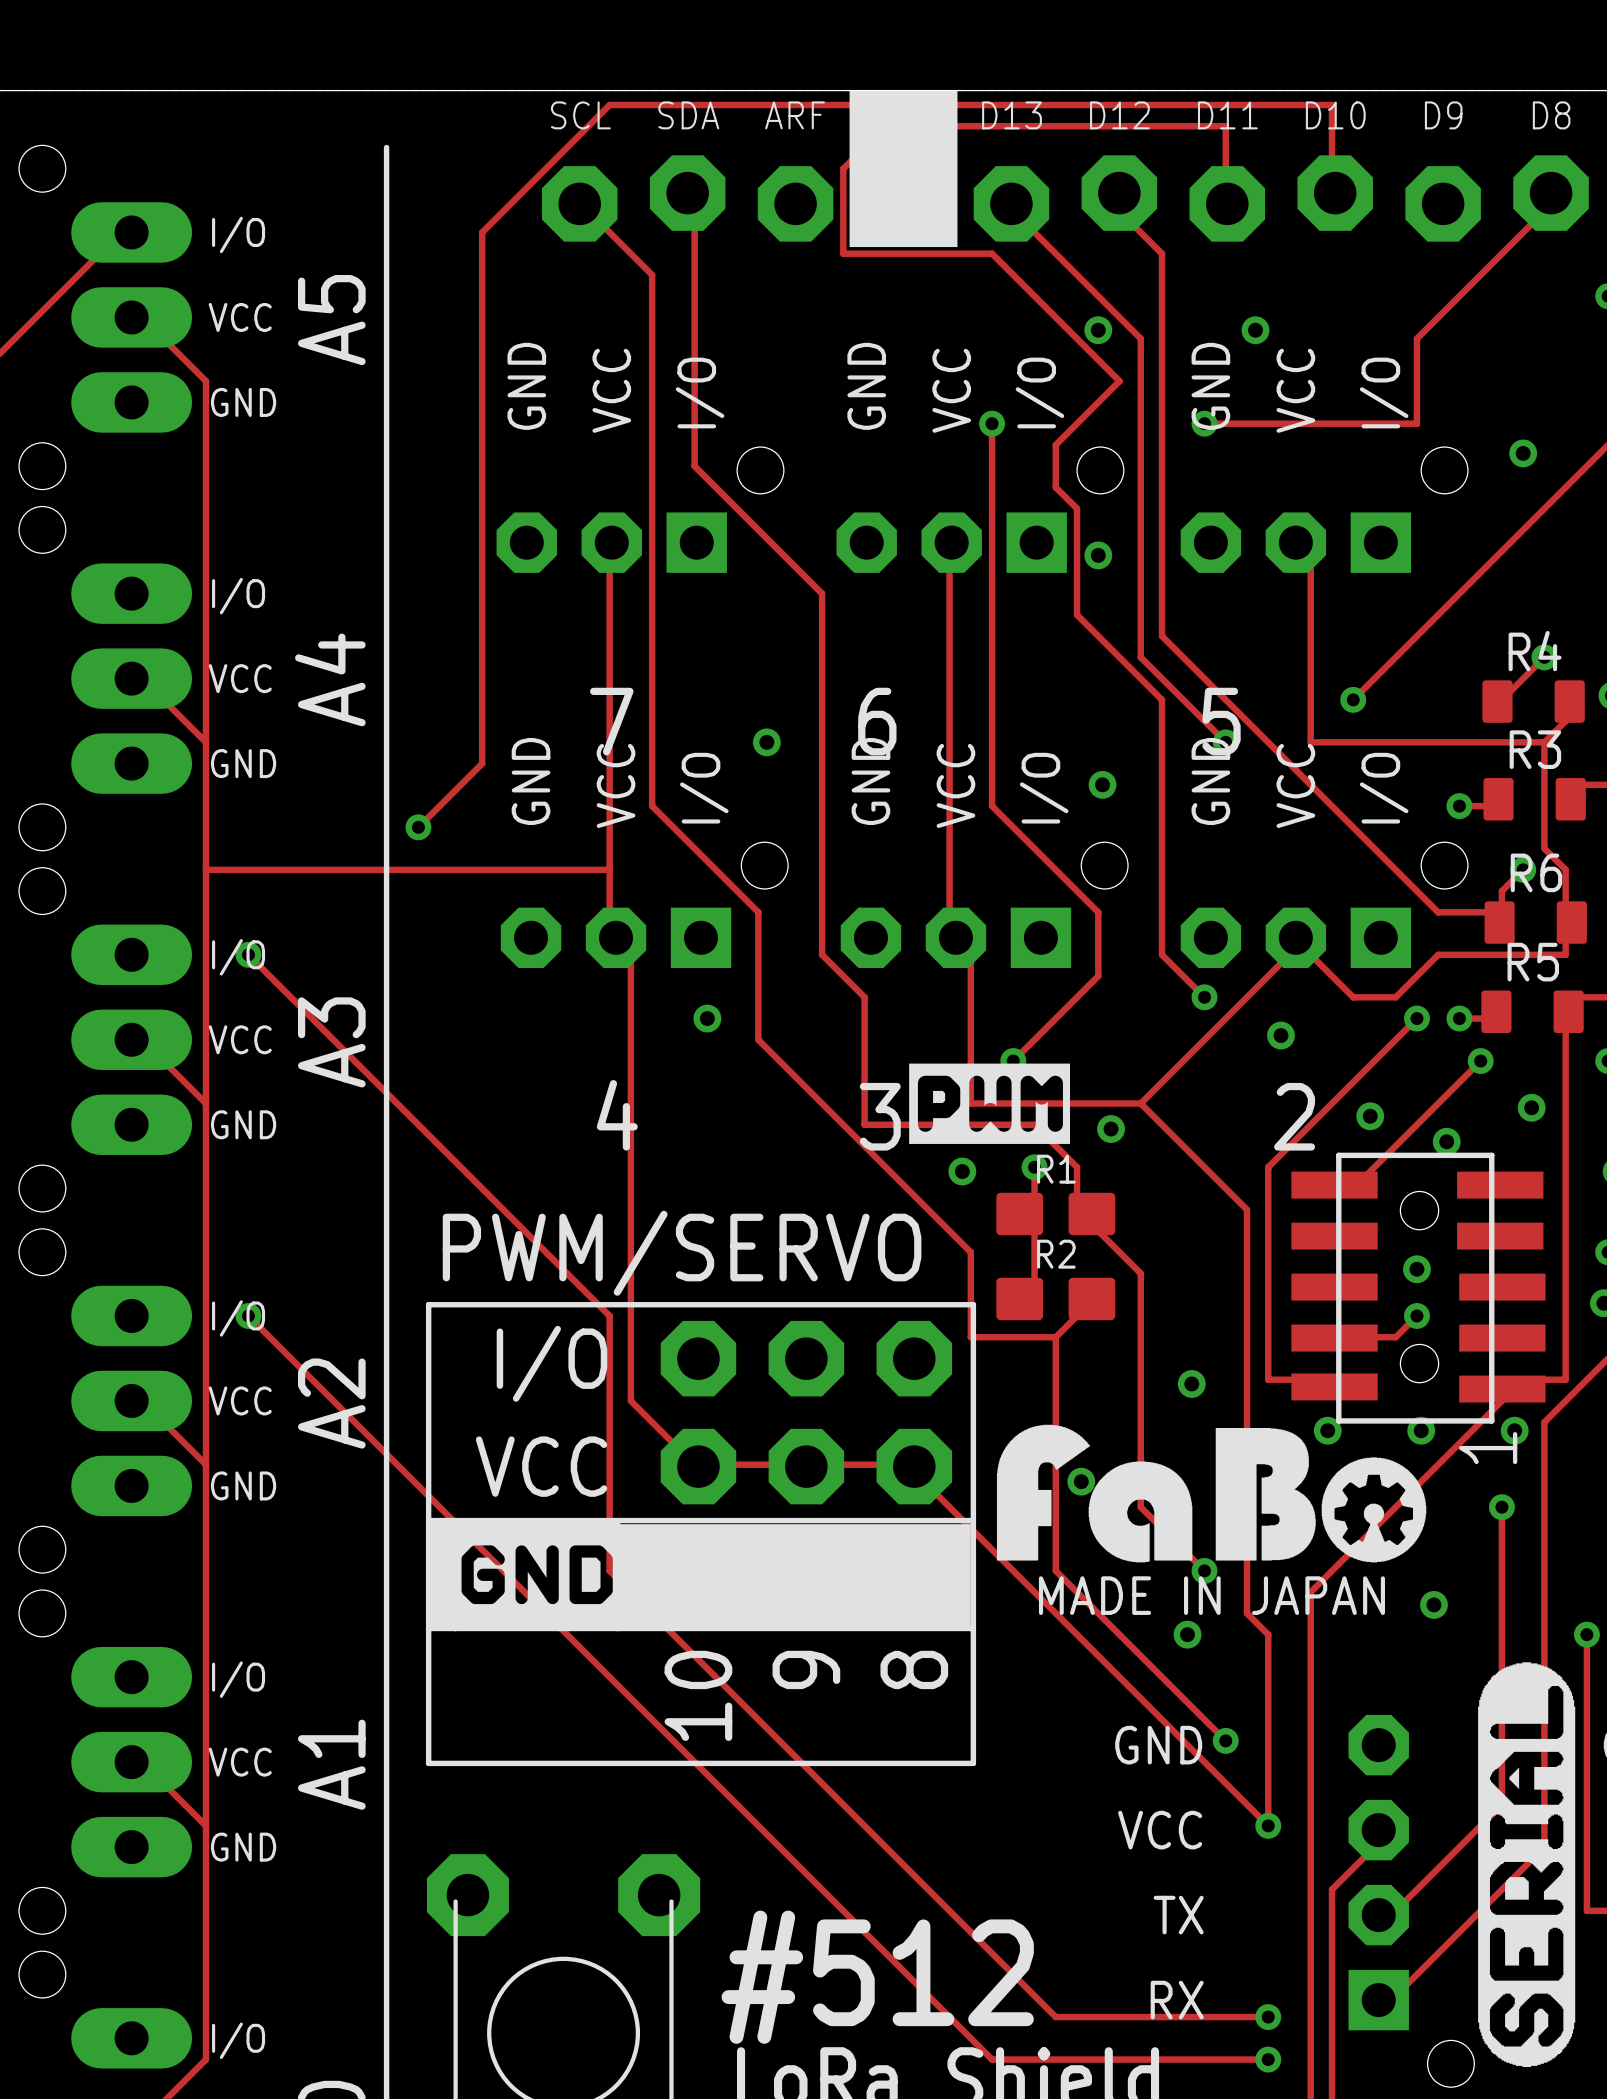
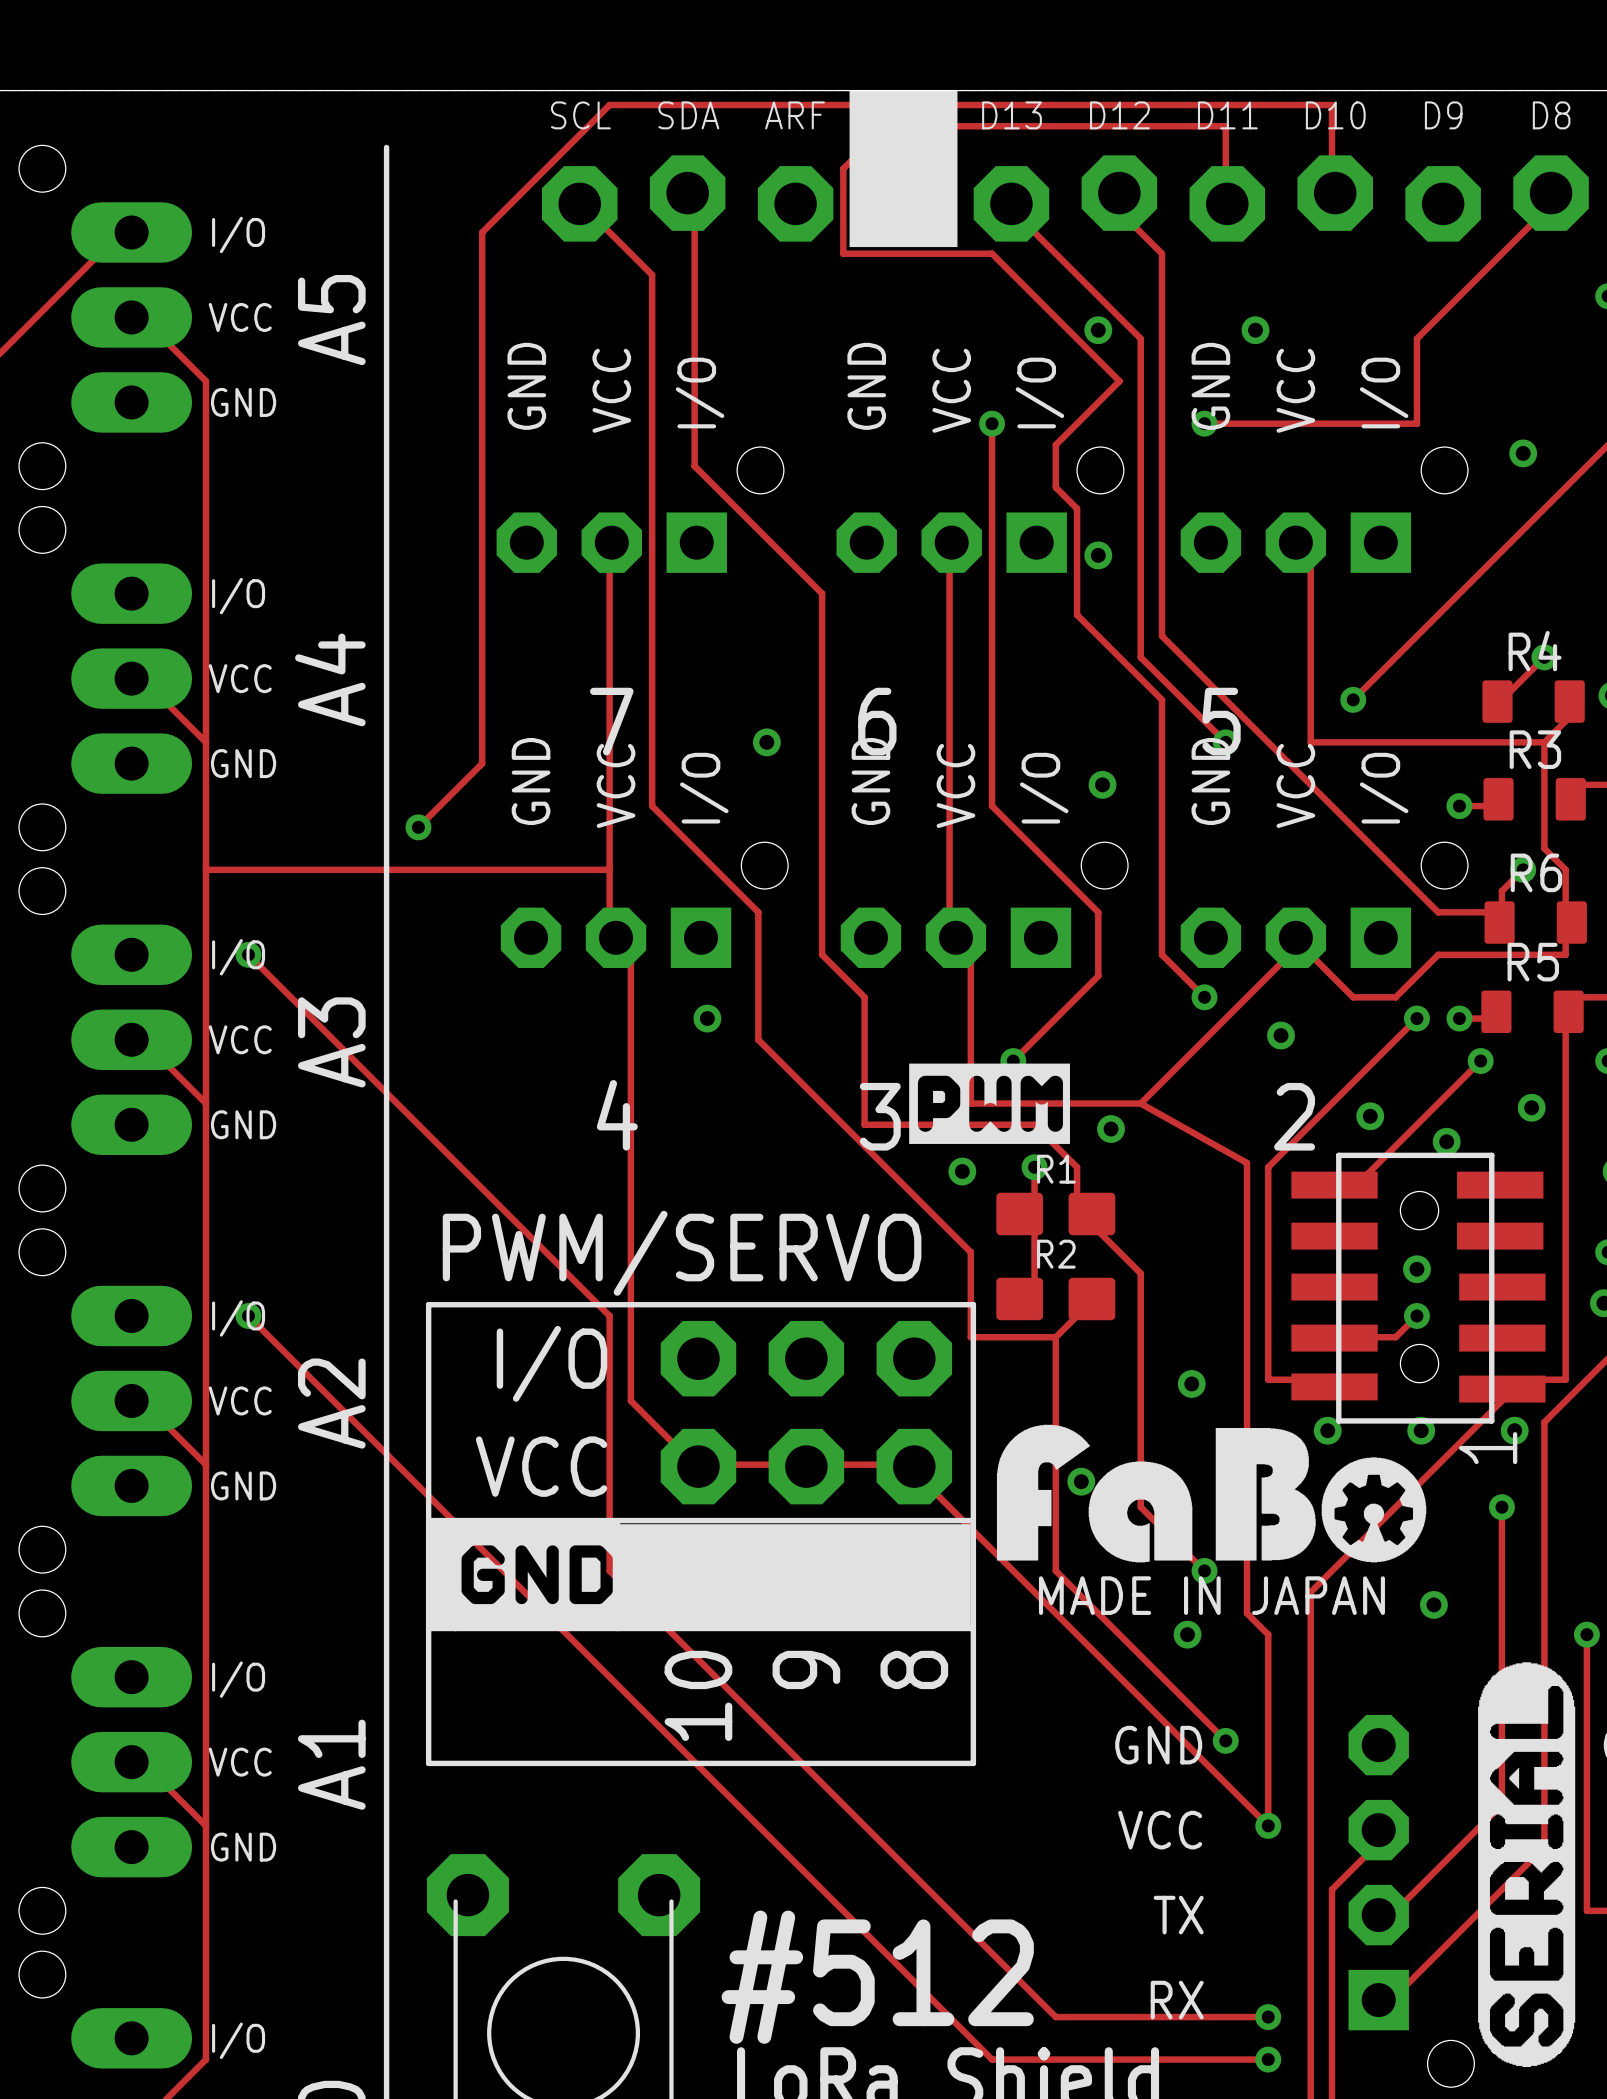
track: (1140, 1103) (1247, 1209) -> (1140, 1103) (1247, 1163) (1247, 1209)

